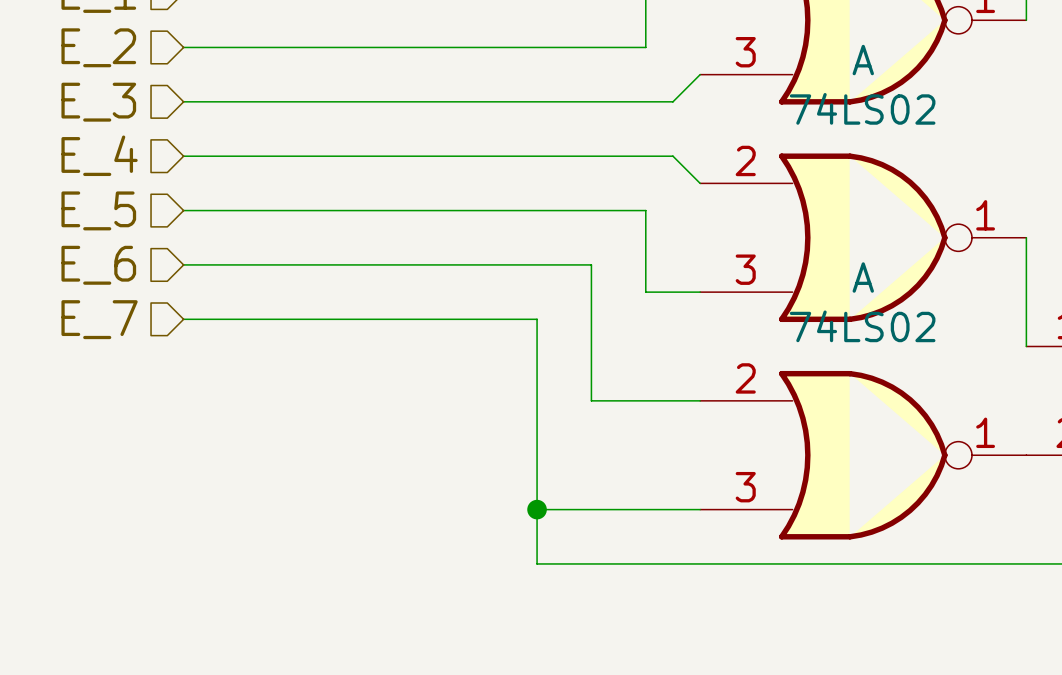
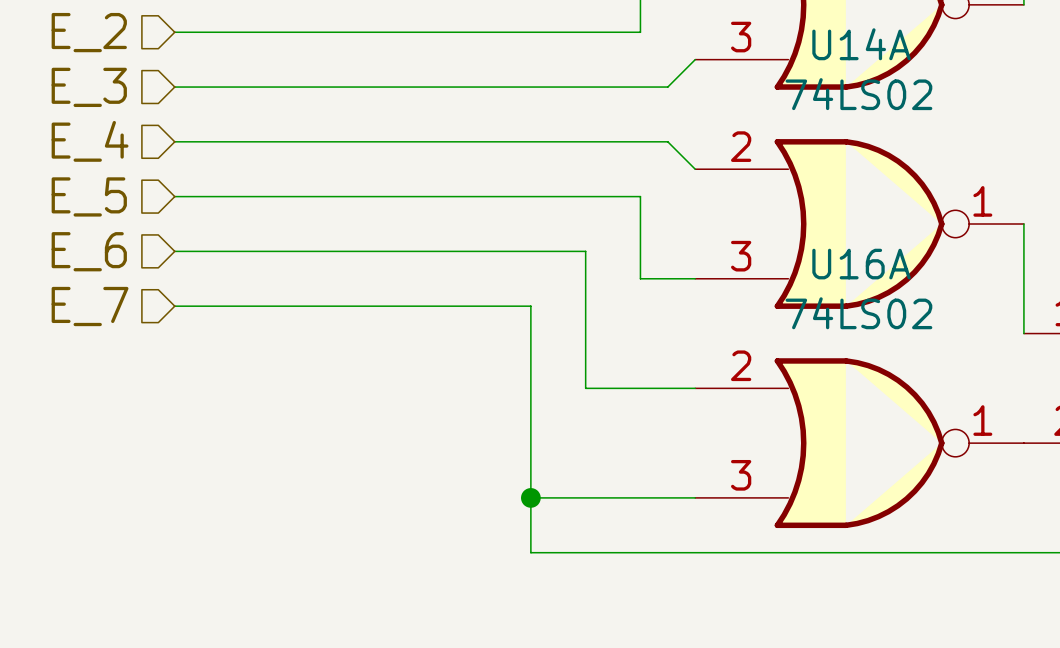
A name: A (863, 60) -> U14A (861, 44)
A name: A (863, 277) -> U16A (861, 264)

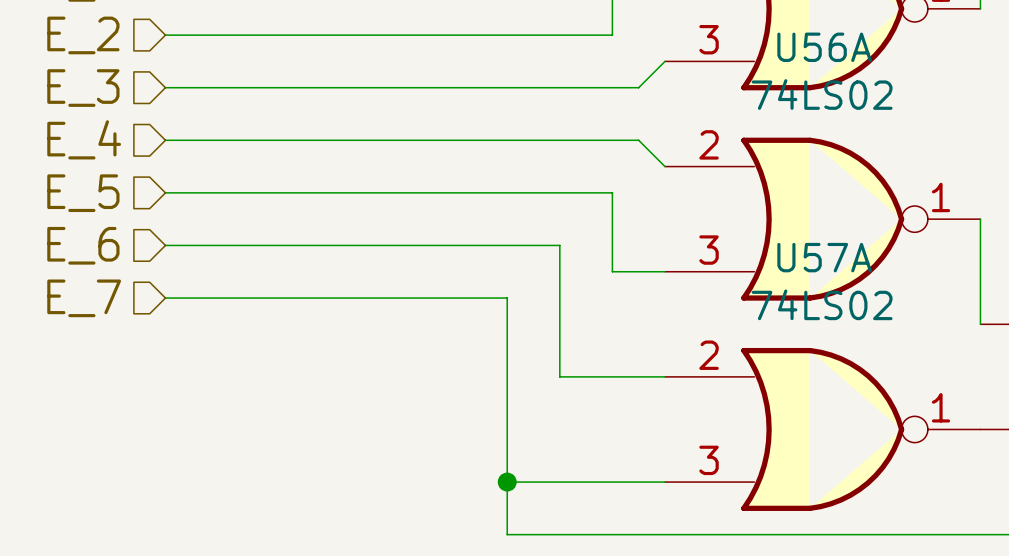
U14A name: U14A (861, 44) -> U56A (824, 47)
U16A name: U16A (861, 264) -> U57A (824, 257)

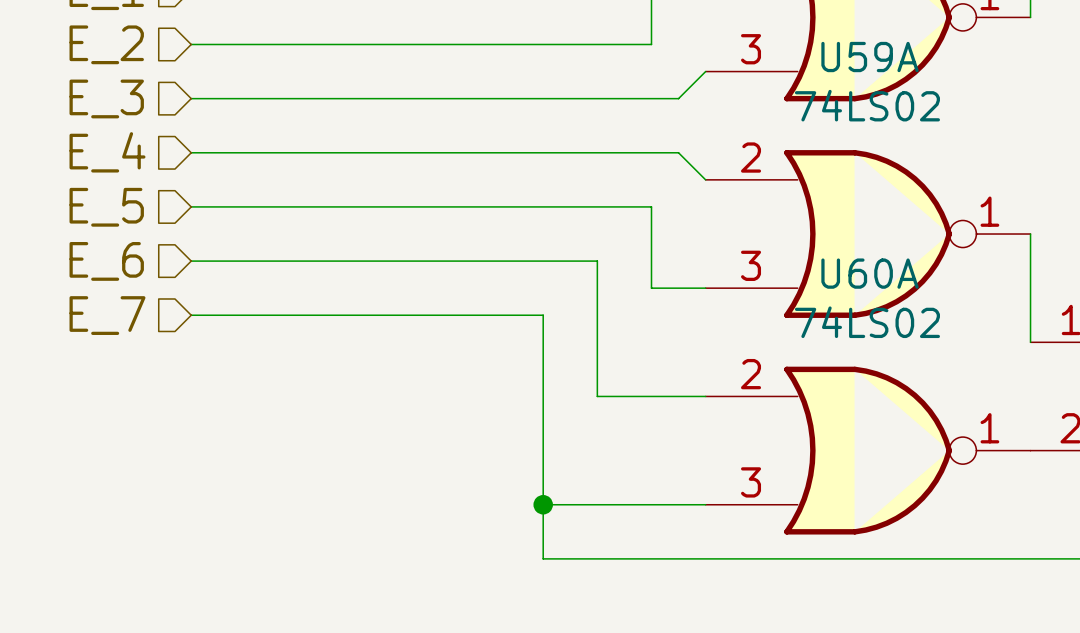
U56A name: U56A (824, 47) -> U59A (870, 57)
U57A name: U57A (824, 257) -> U60A (870, 273)

